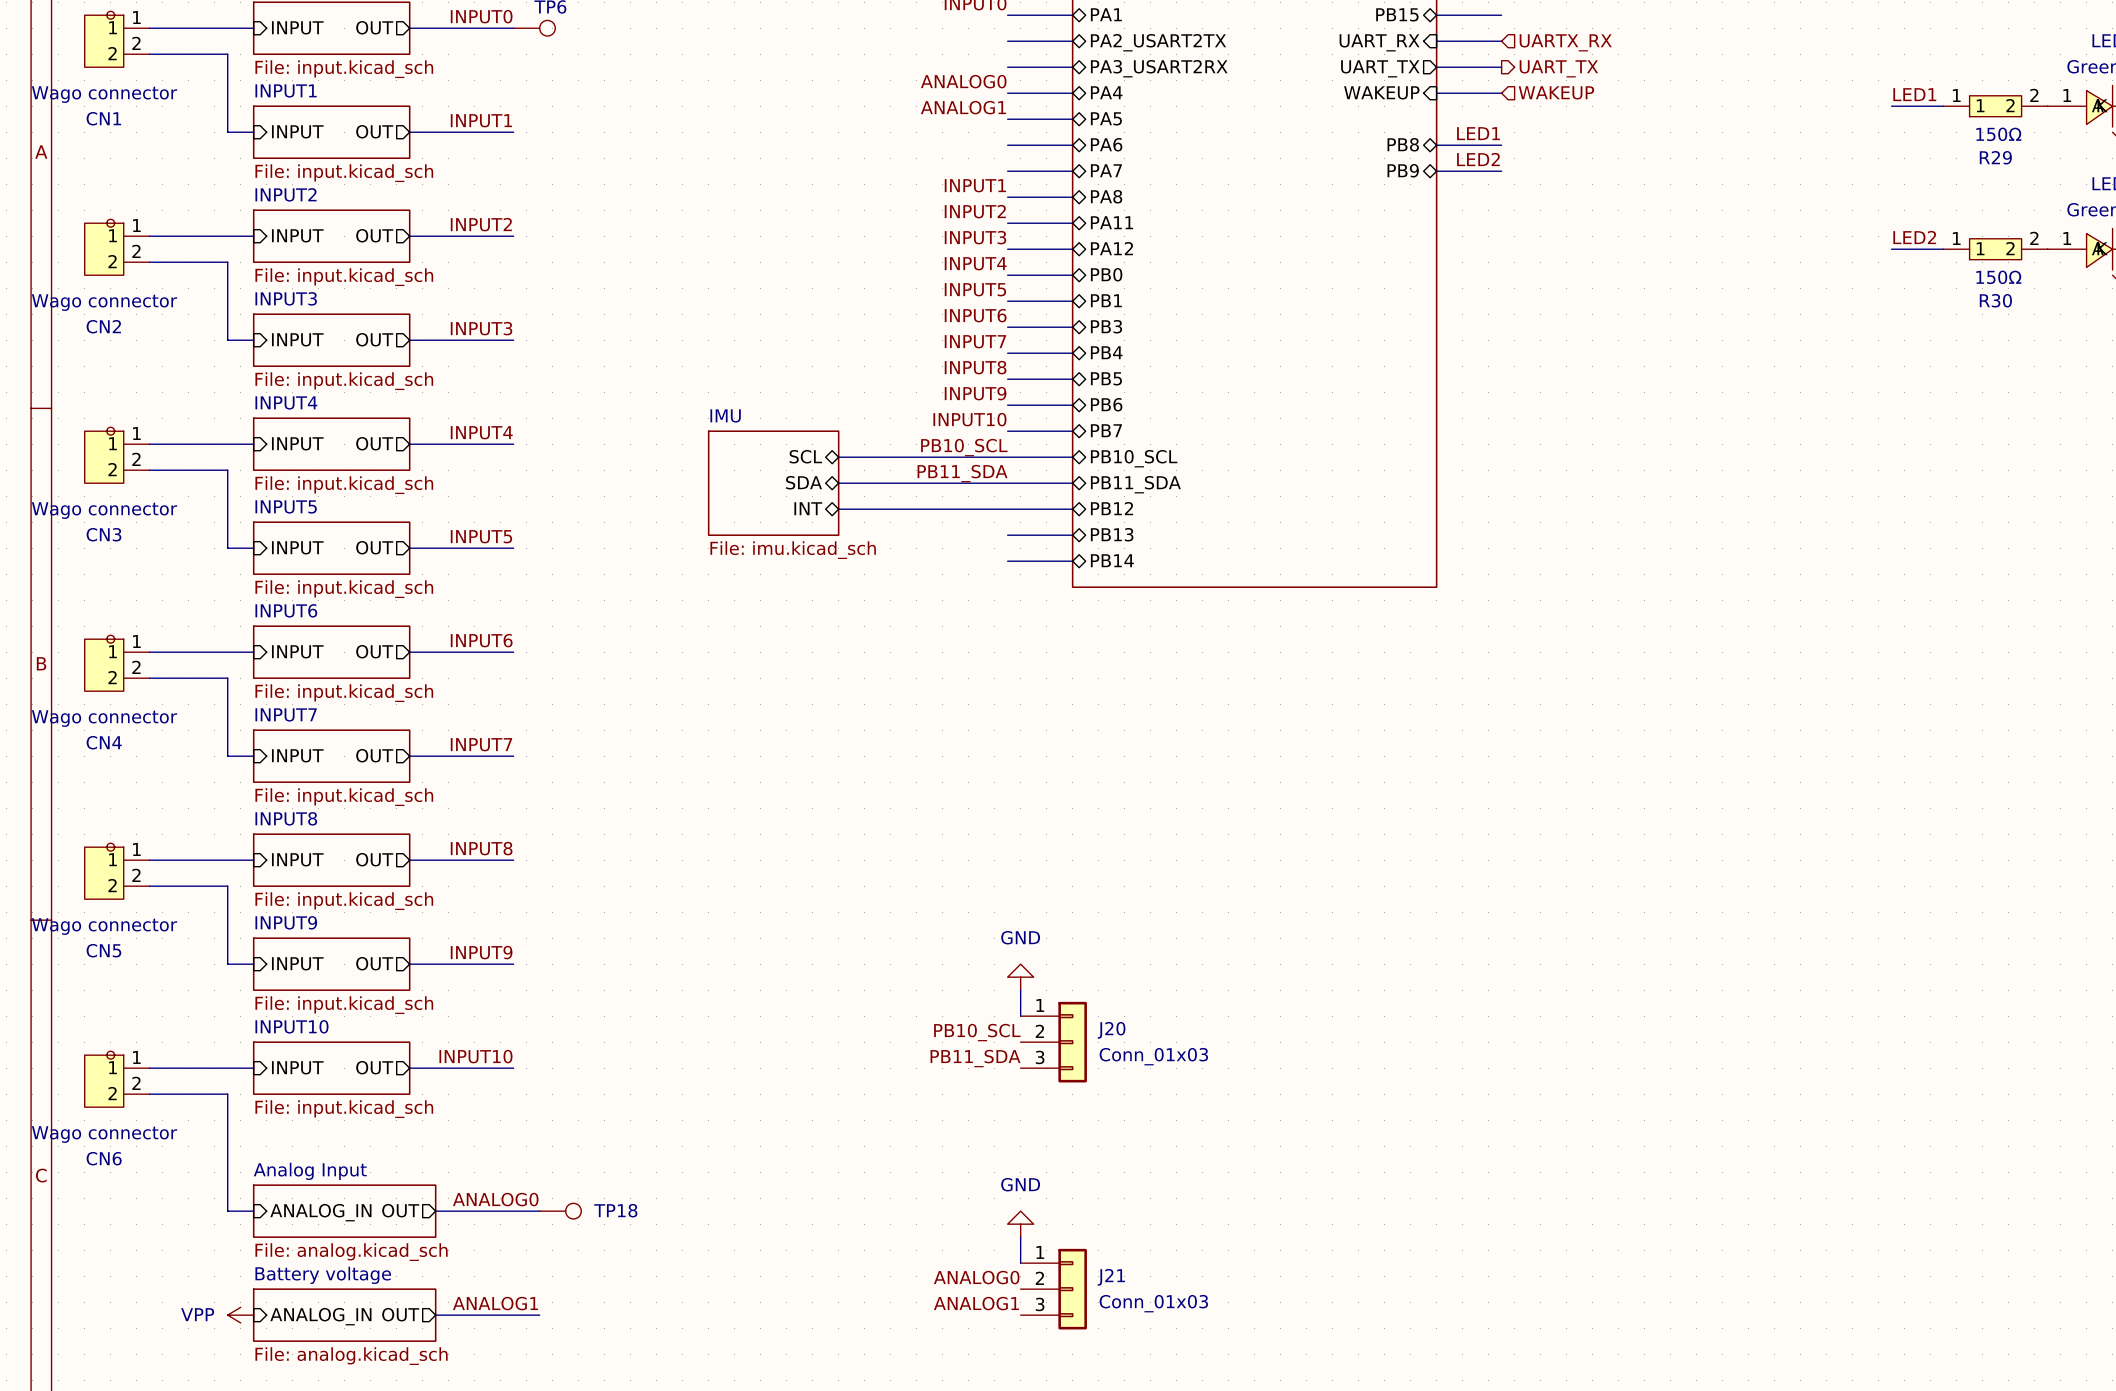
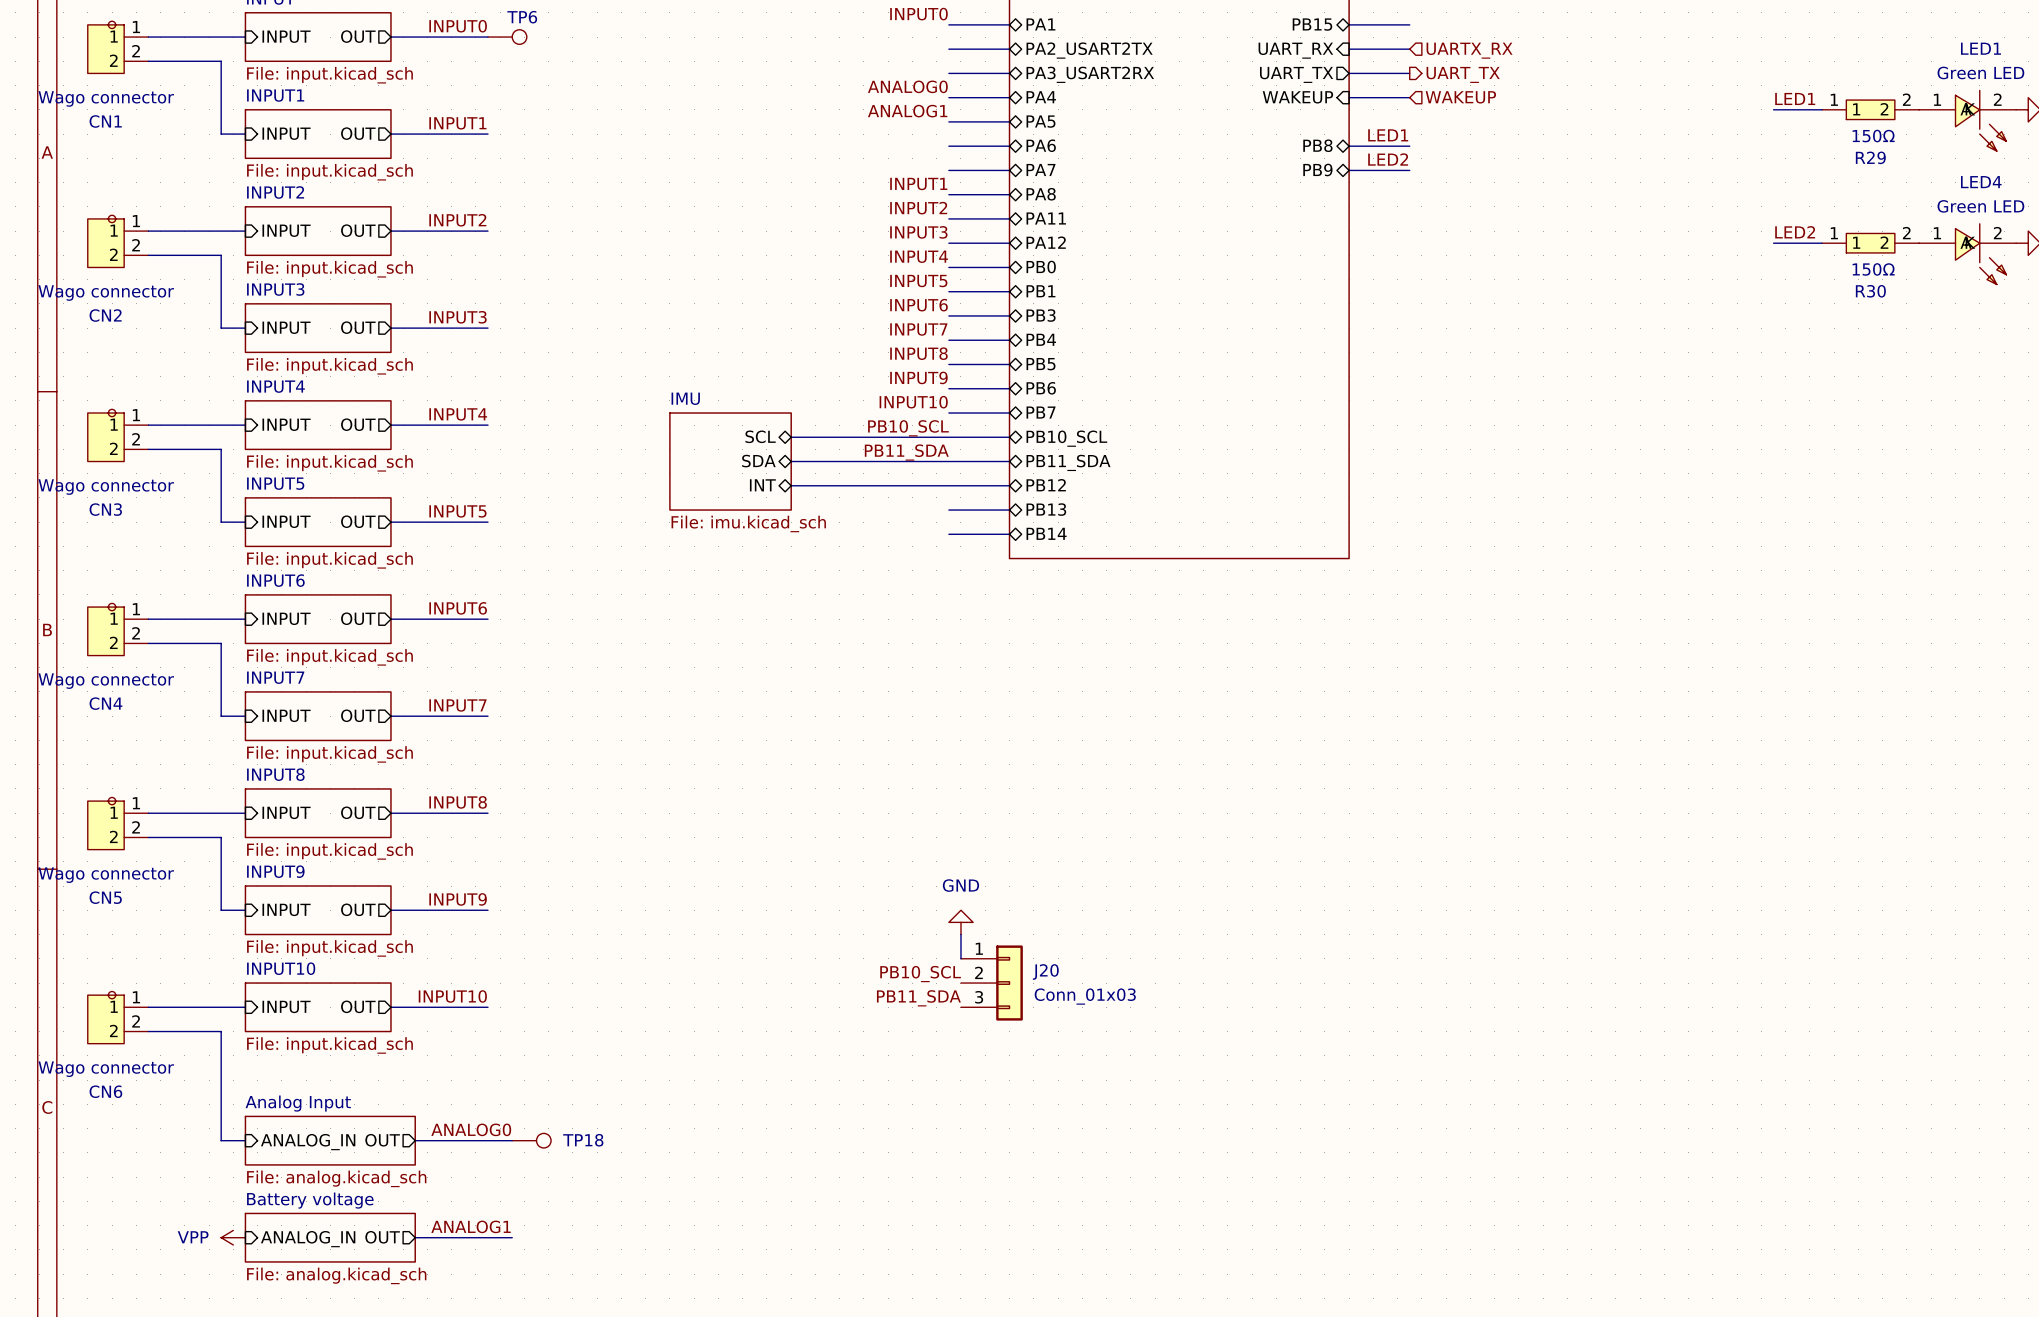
power symbol: GND (1020, 1224) -> none
wire: (1020, 1237) (1020, 1263) -> none
label: ANALOG0 (976, 1277) -> none
J21: Conn_01x03 (1053, 1289) -> none
label: ANALOG1 (976, 1303) -> none

